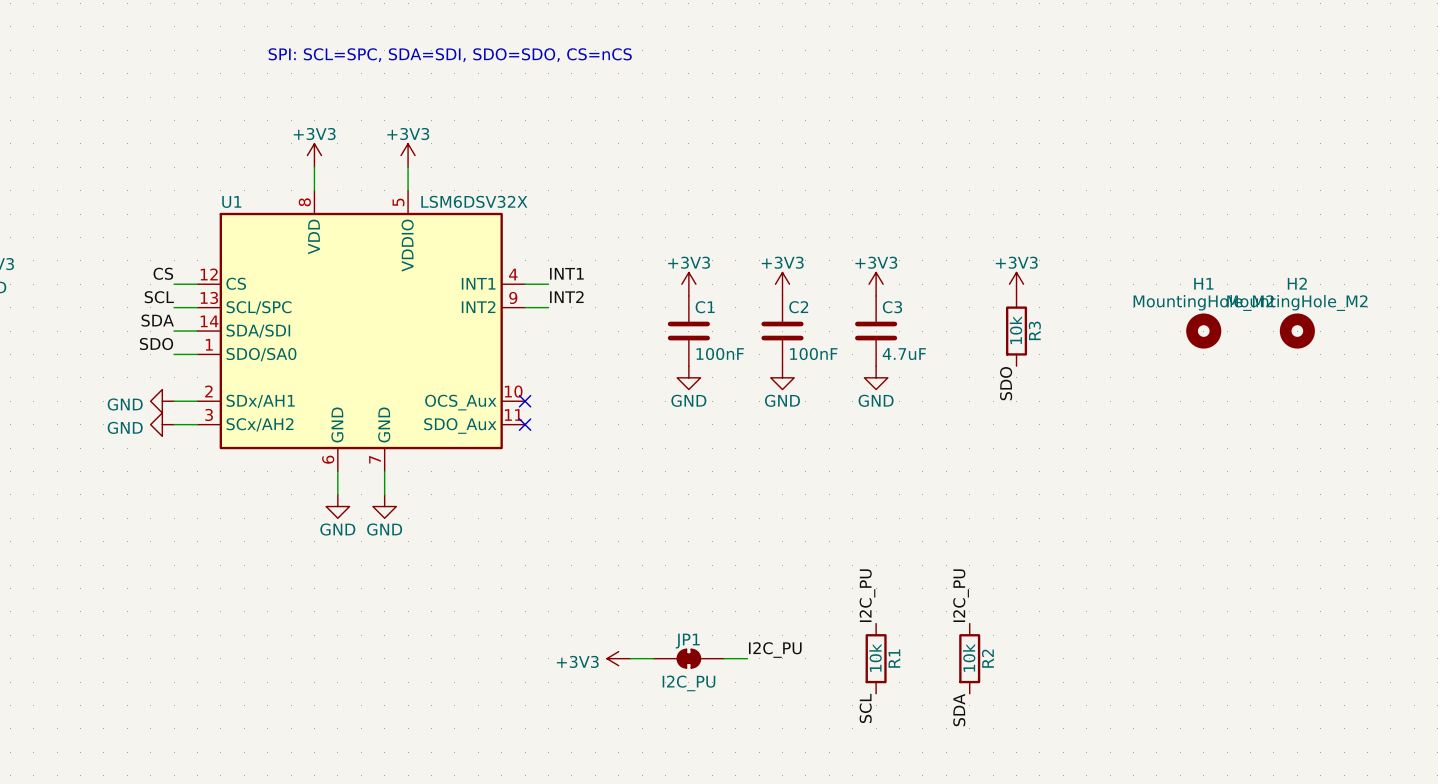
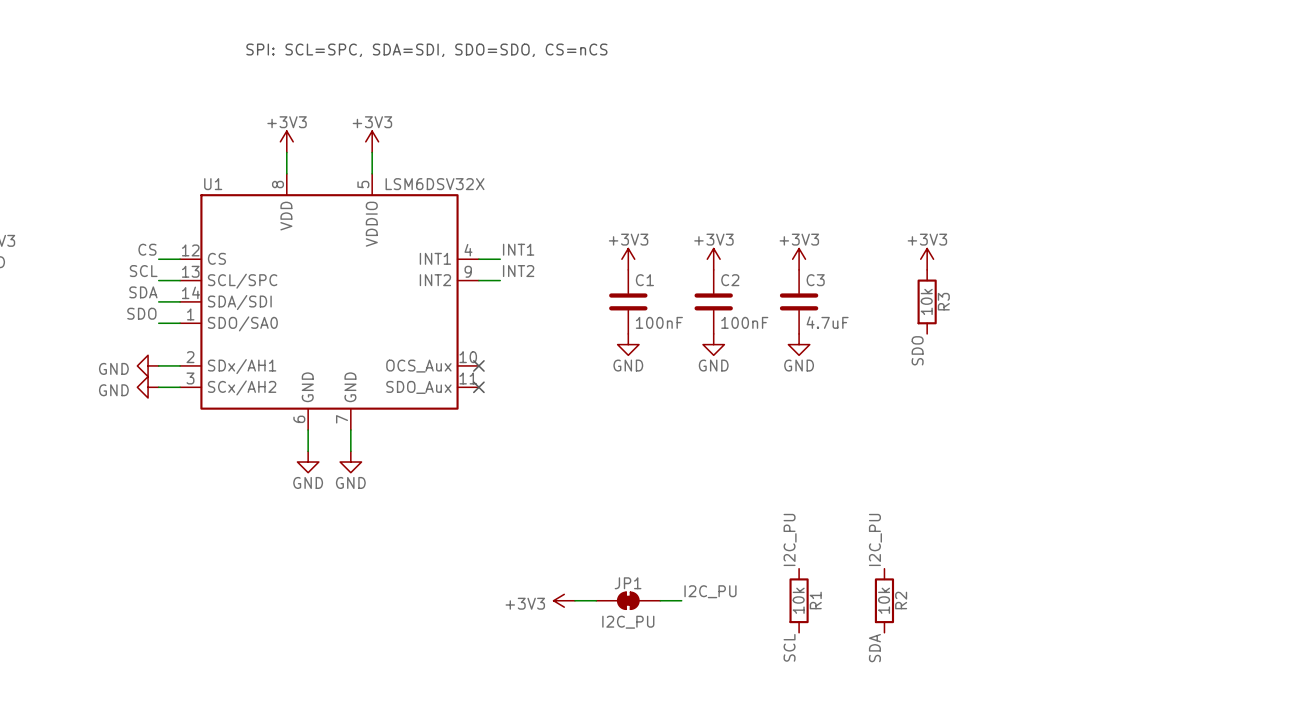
H1: MountingHole_M2 (1203, 331) -> none
H2: MountingHole_M2 (1297, 331) -> none

